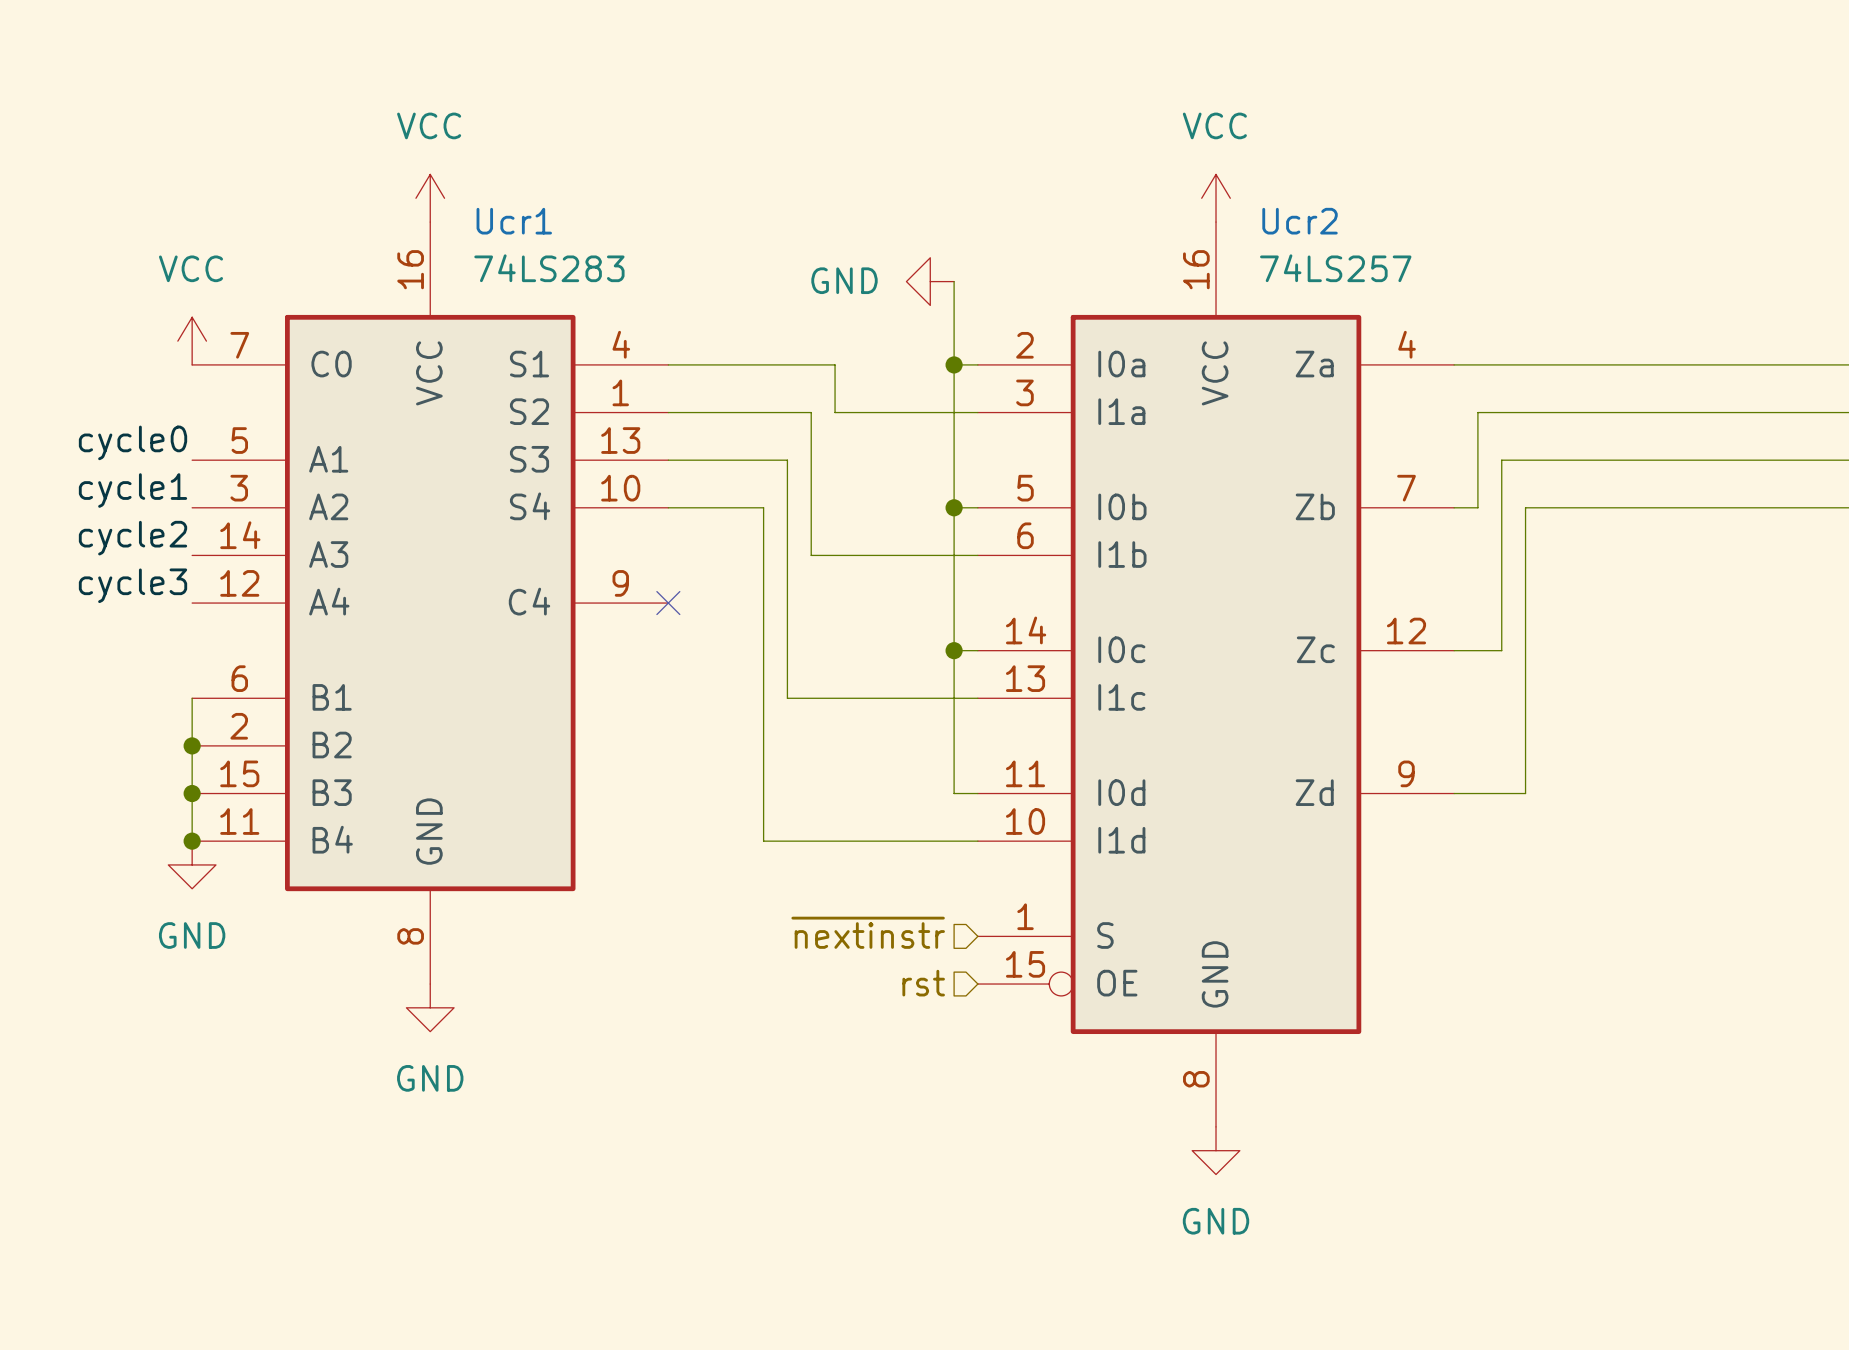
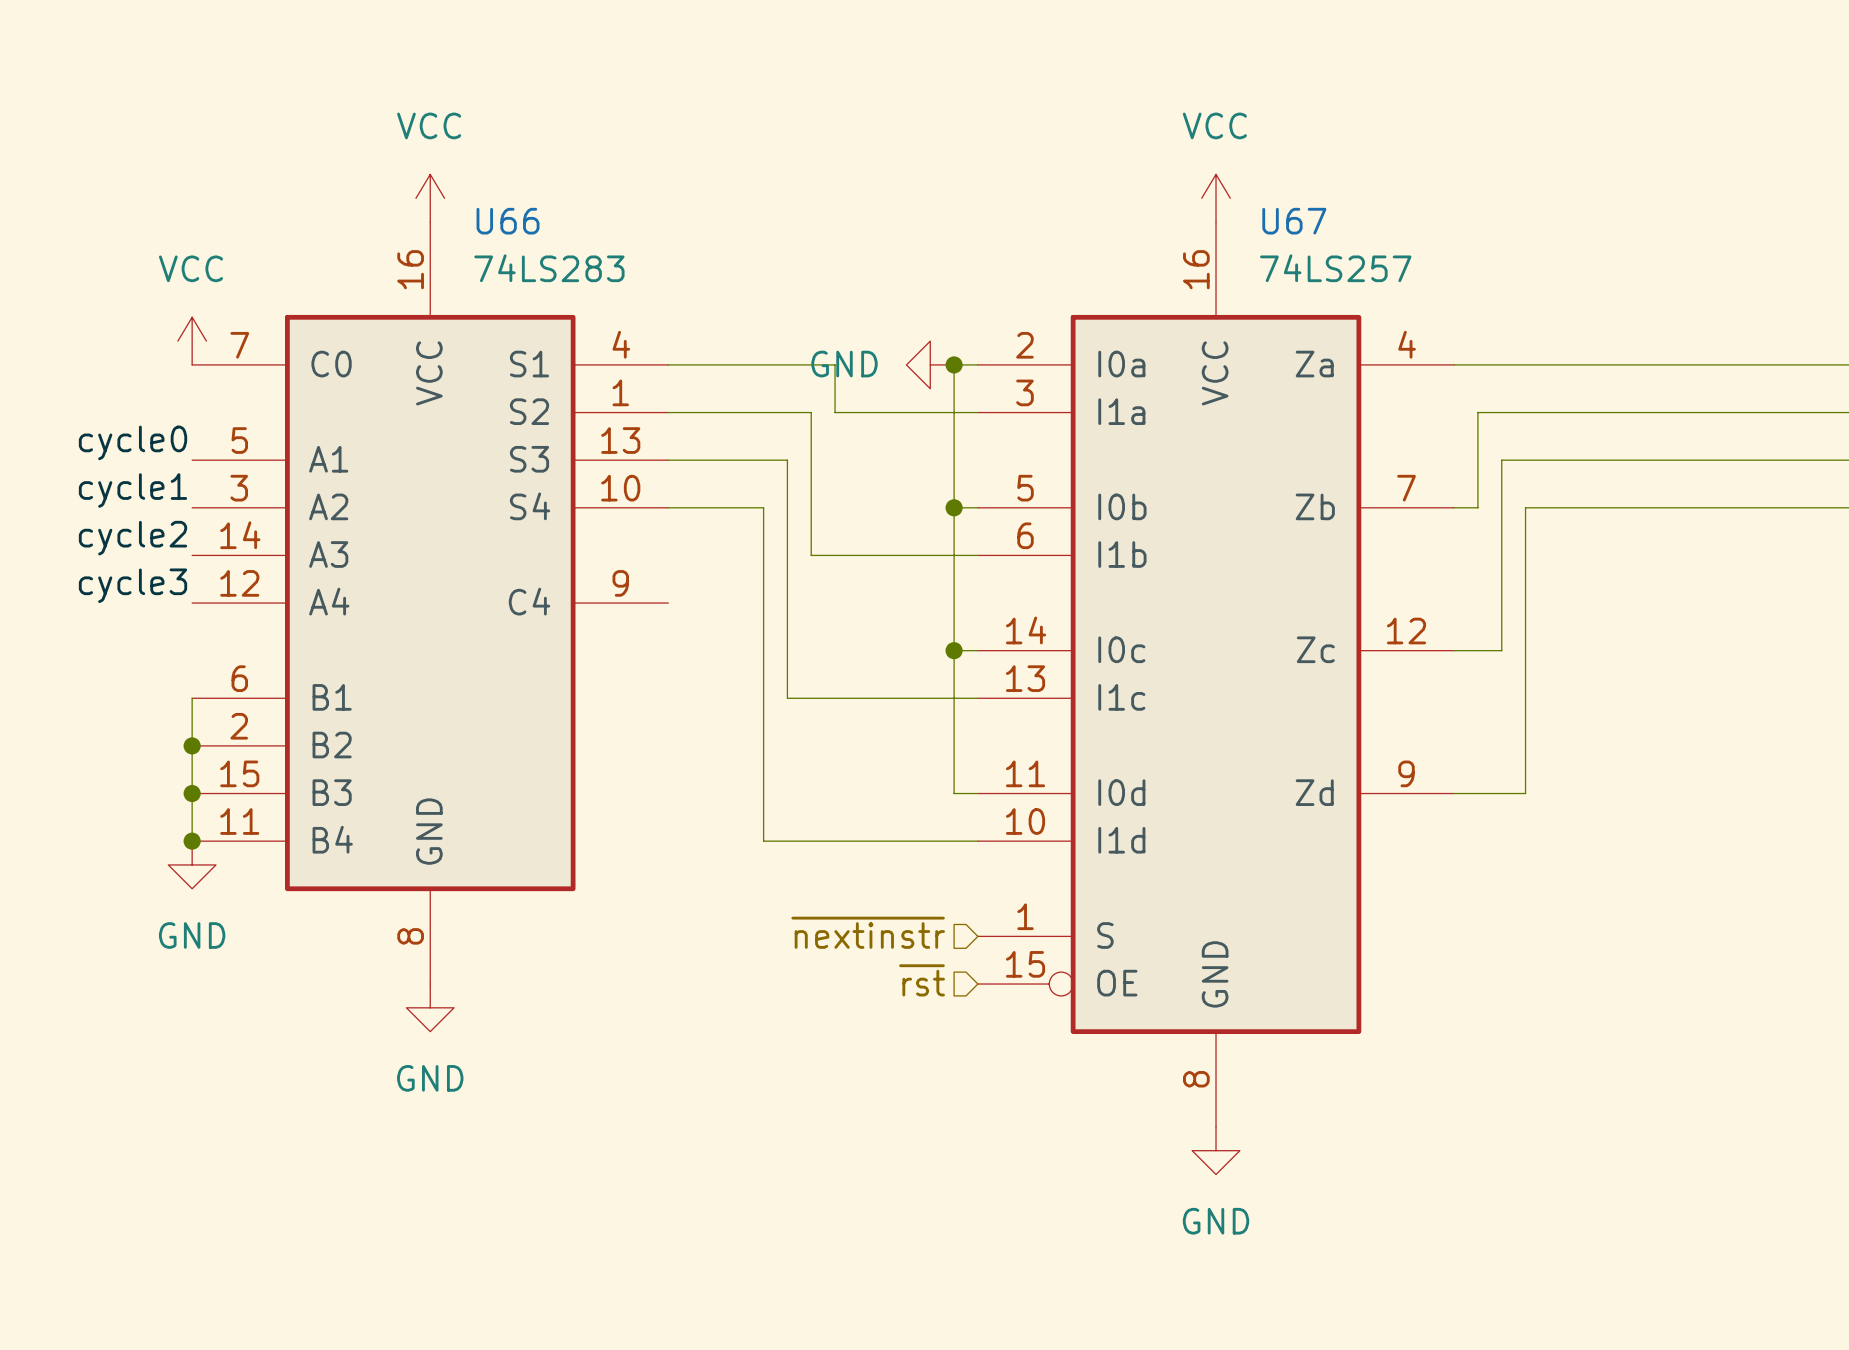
Ucr1 name: Ucr1 (514, 221) -> U66 (508, 221)
Ucr2 name: Ucr2 (1300, 221) -> U67 (1294, 221)
power symbol position: GND (930, 281) -> GND (930, 364)
wire: (954, 281) (954, 364) -> none
no-connect mark: (668, 603) -> none
hierarchical label: rst (923, 983) -> ~{rst} (922, 980)

